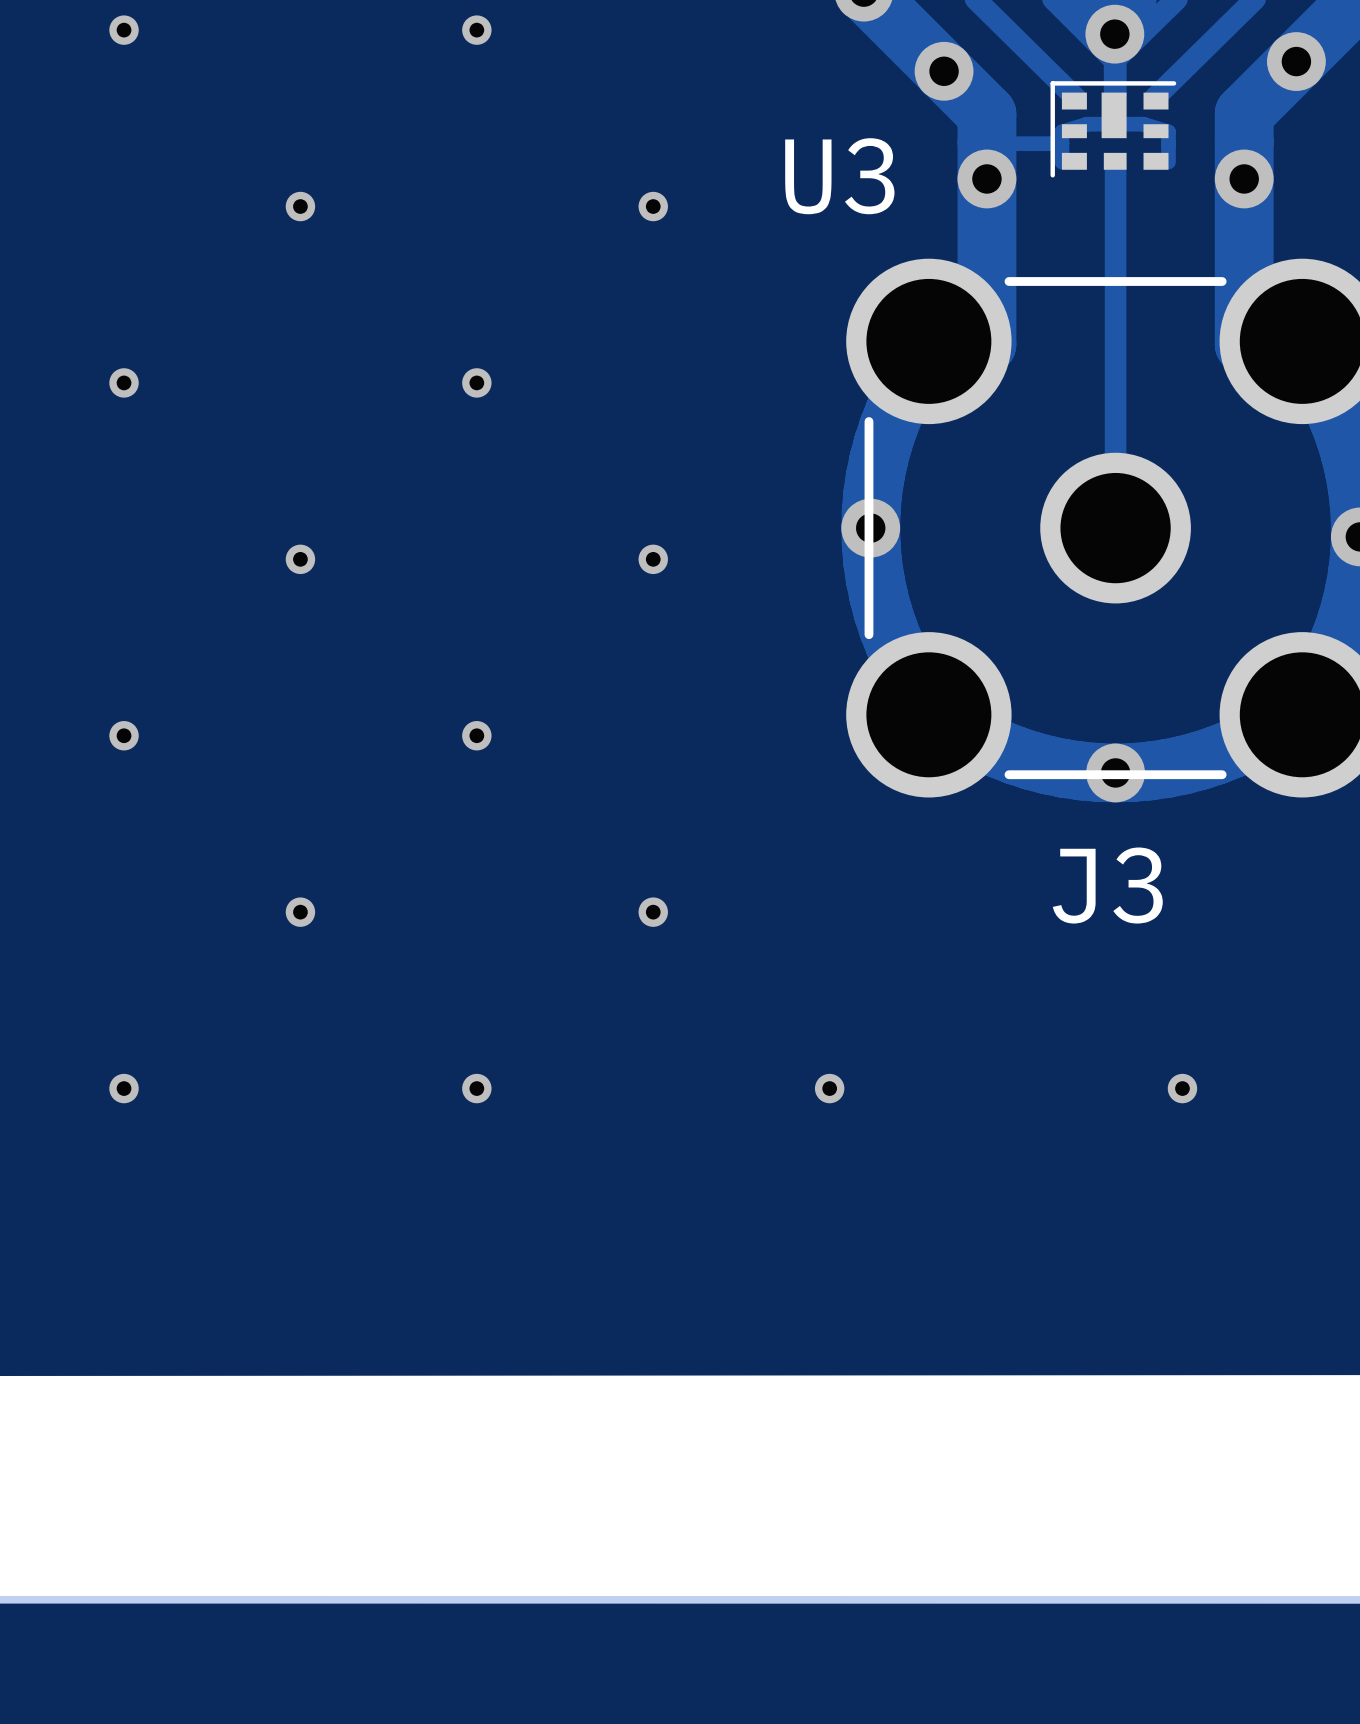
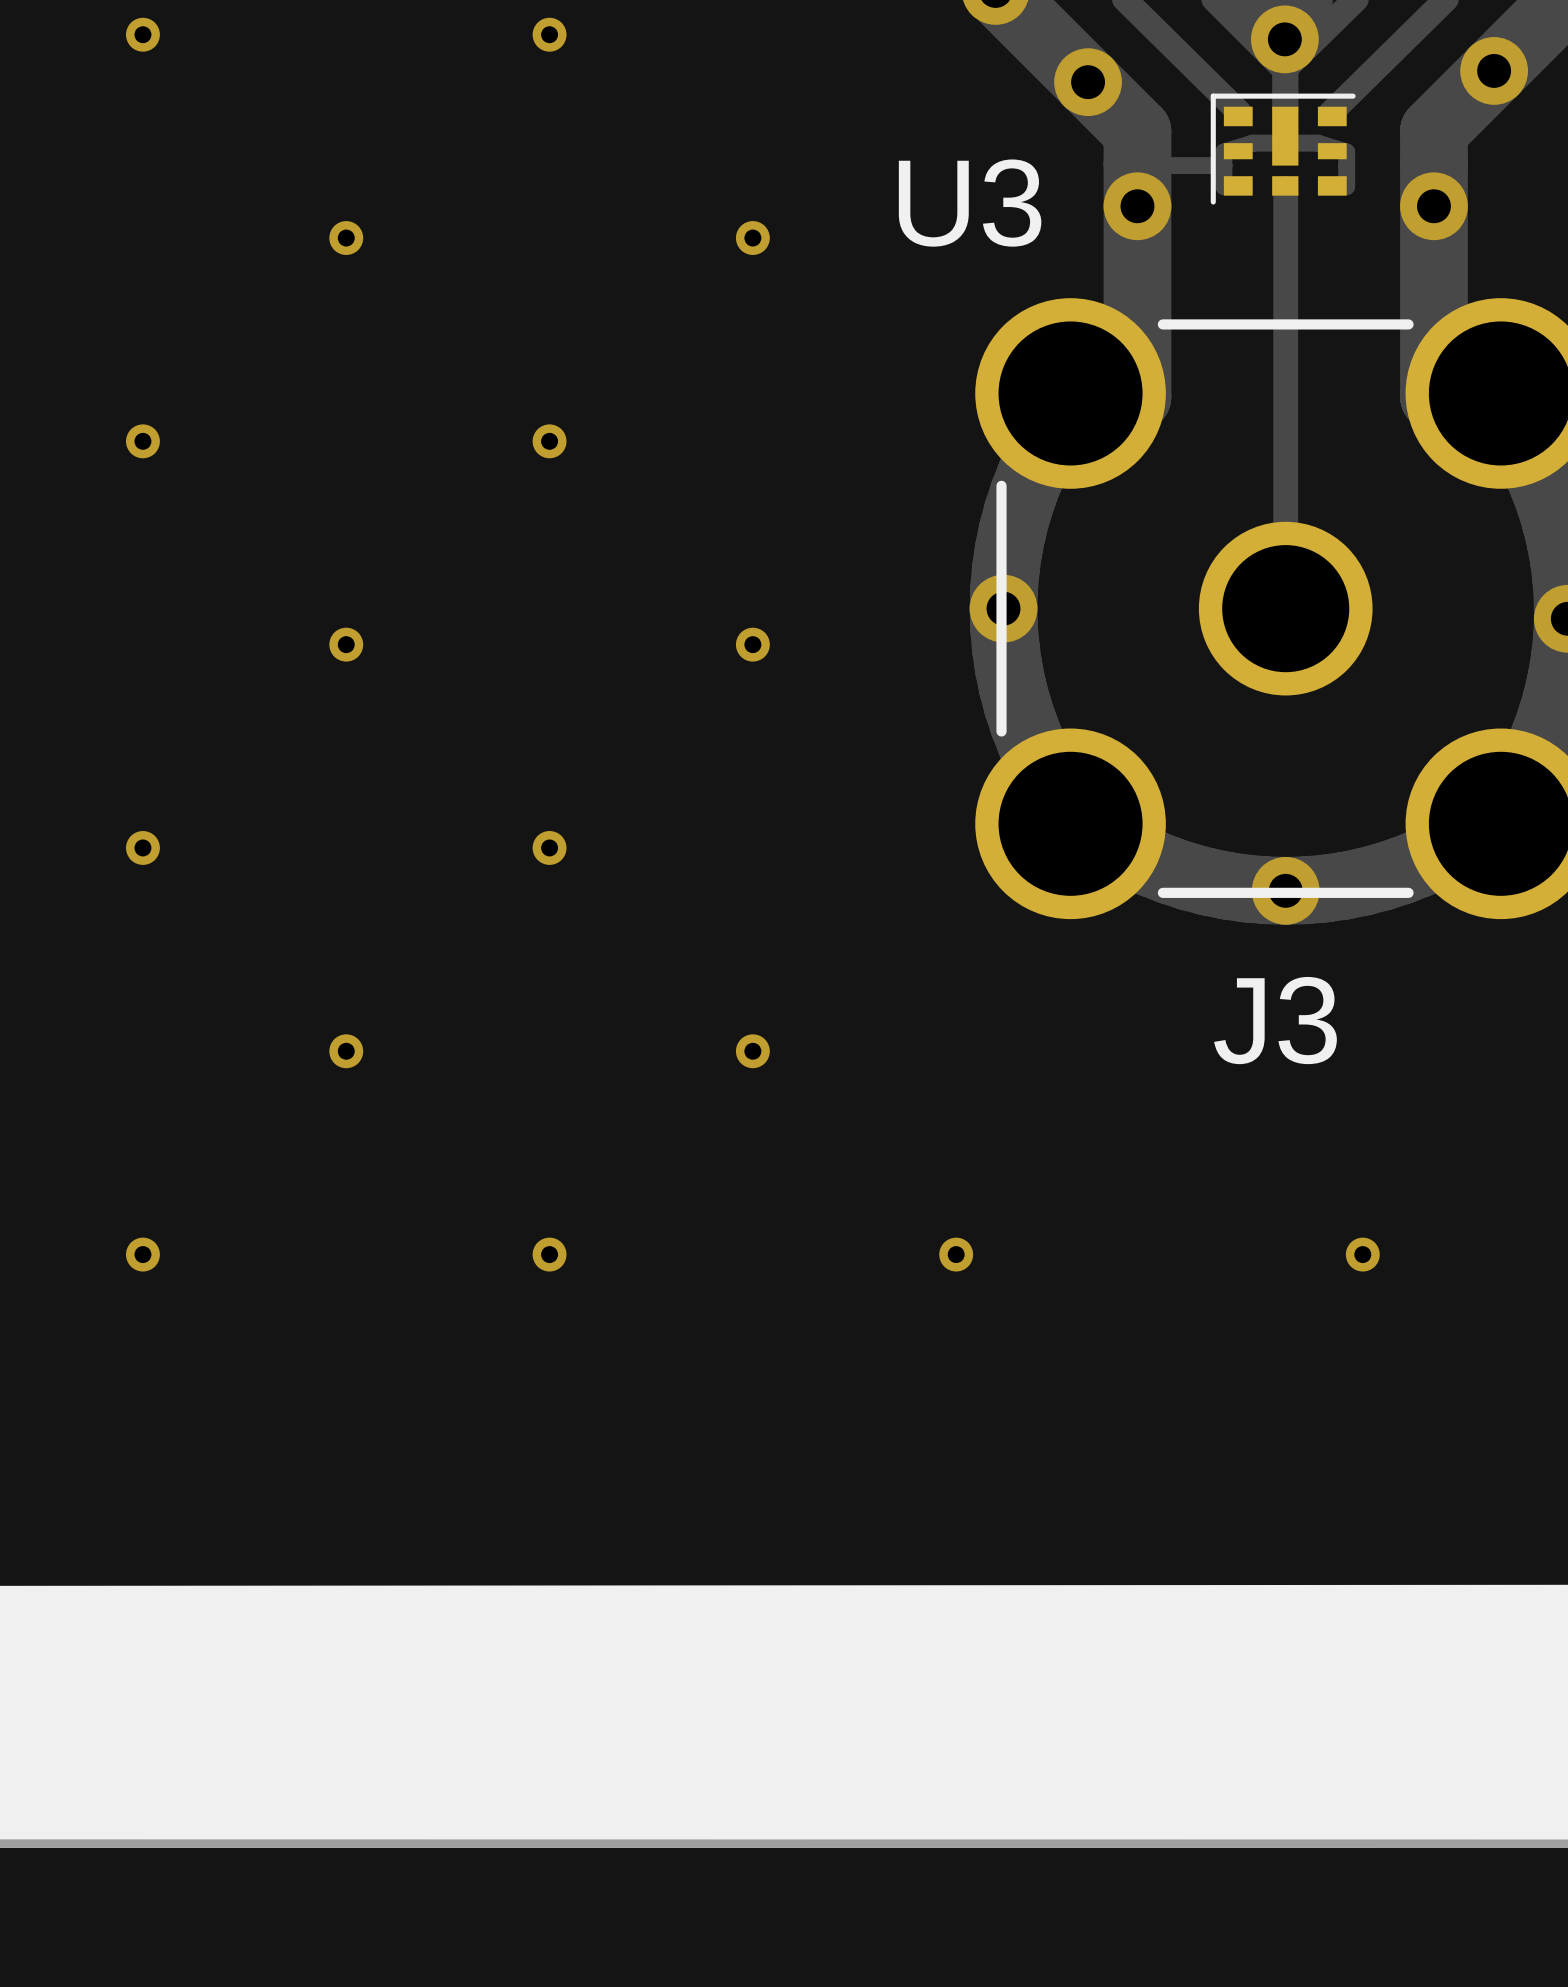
U3 footprint: [1050, 81, 1177, 178] -> [1210, 93, 1356, 205]

